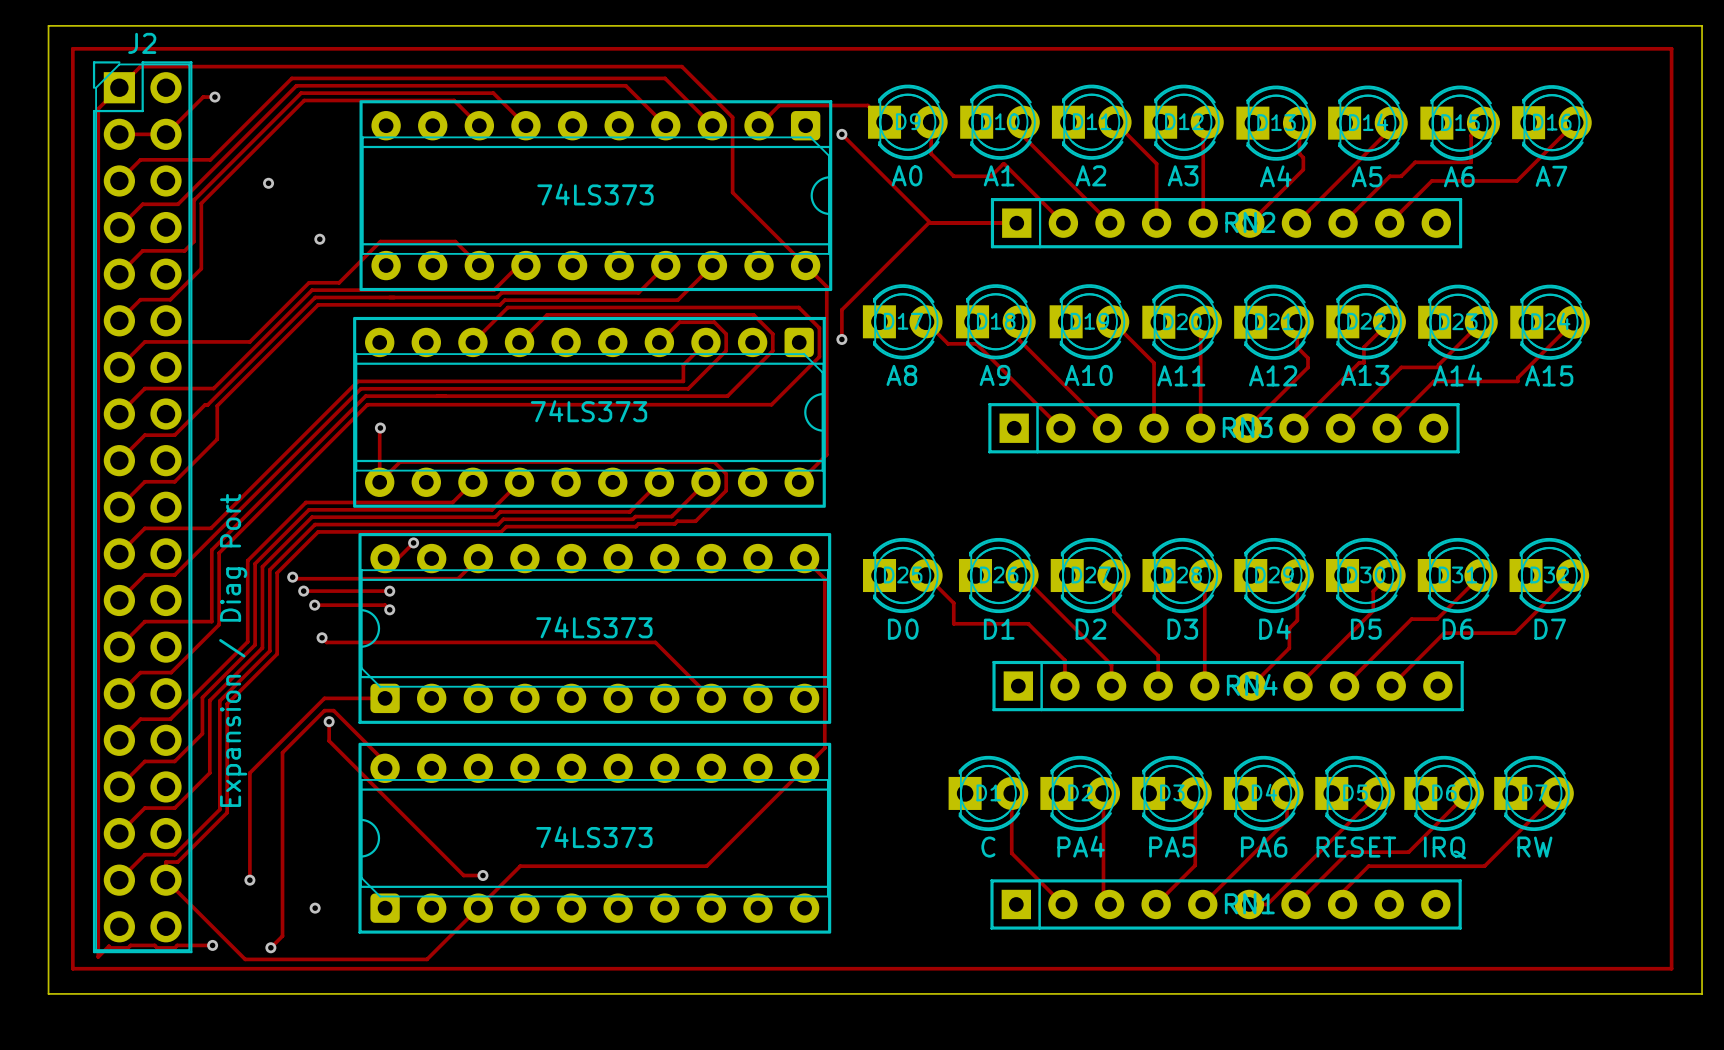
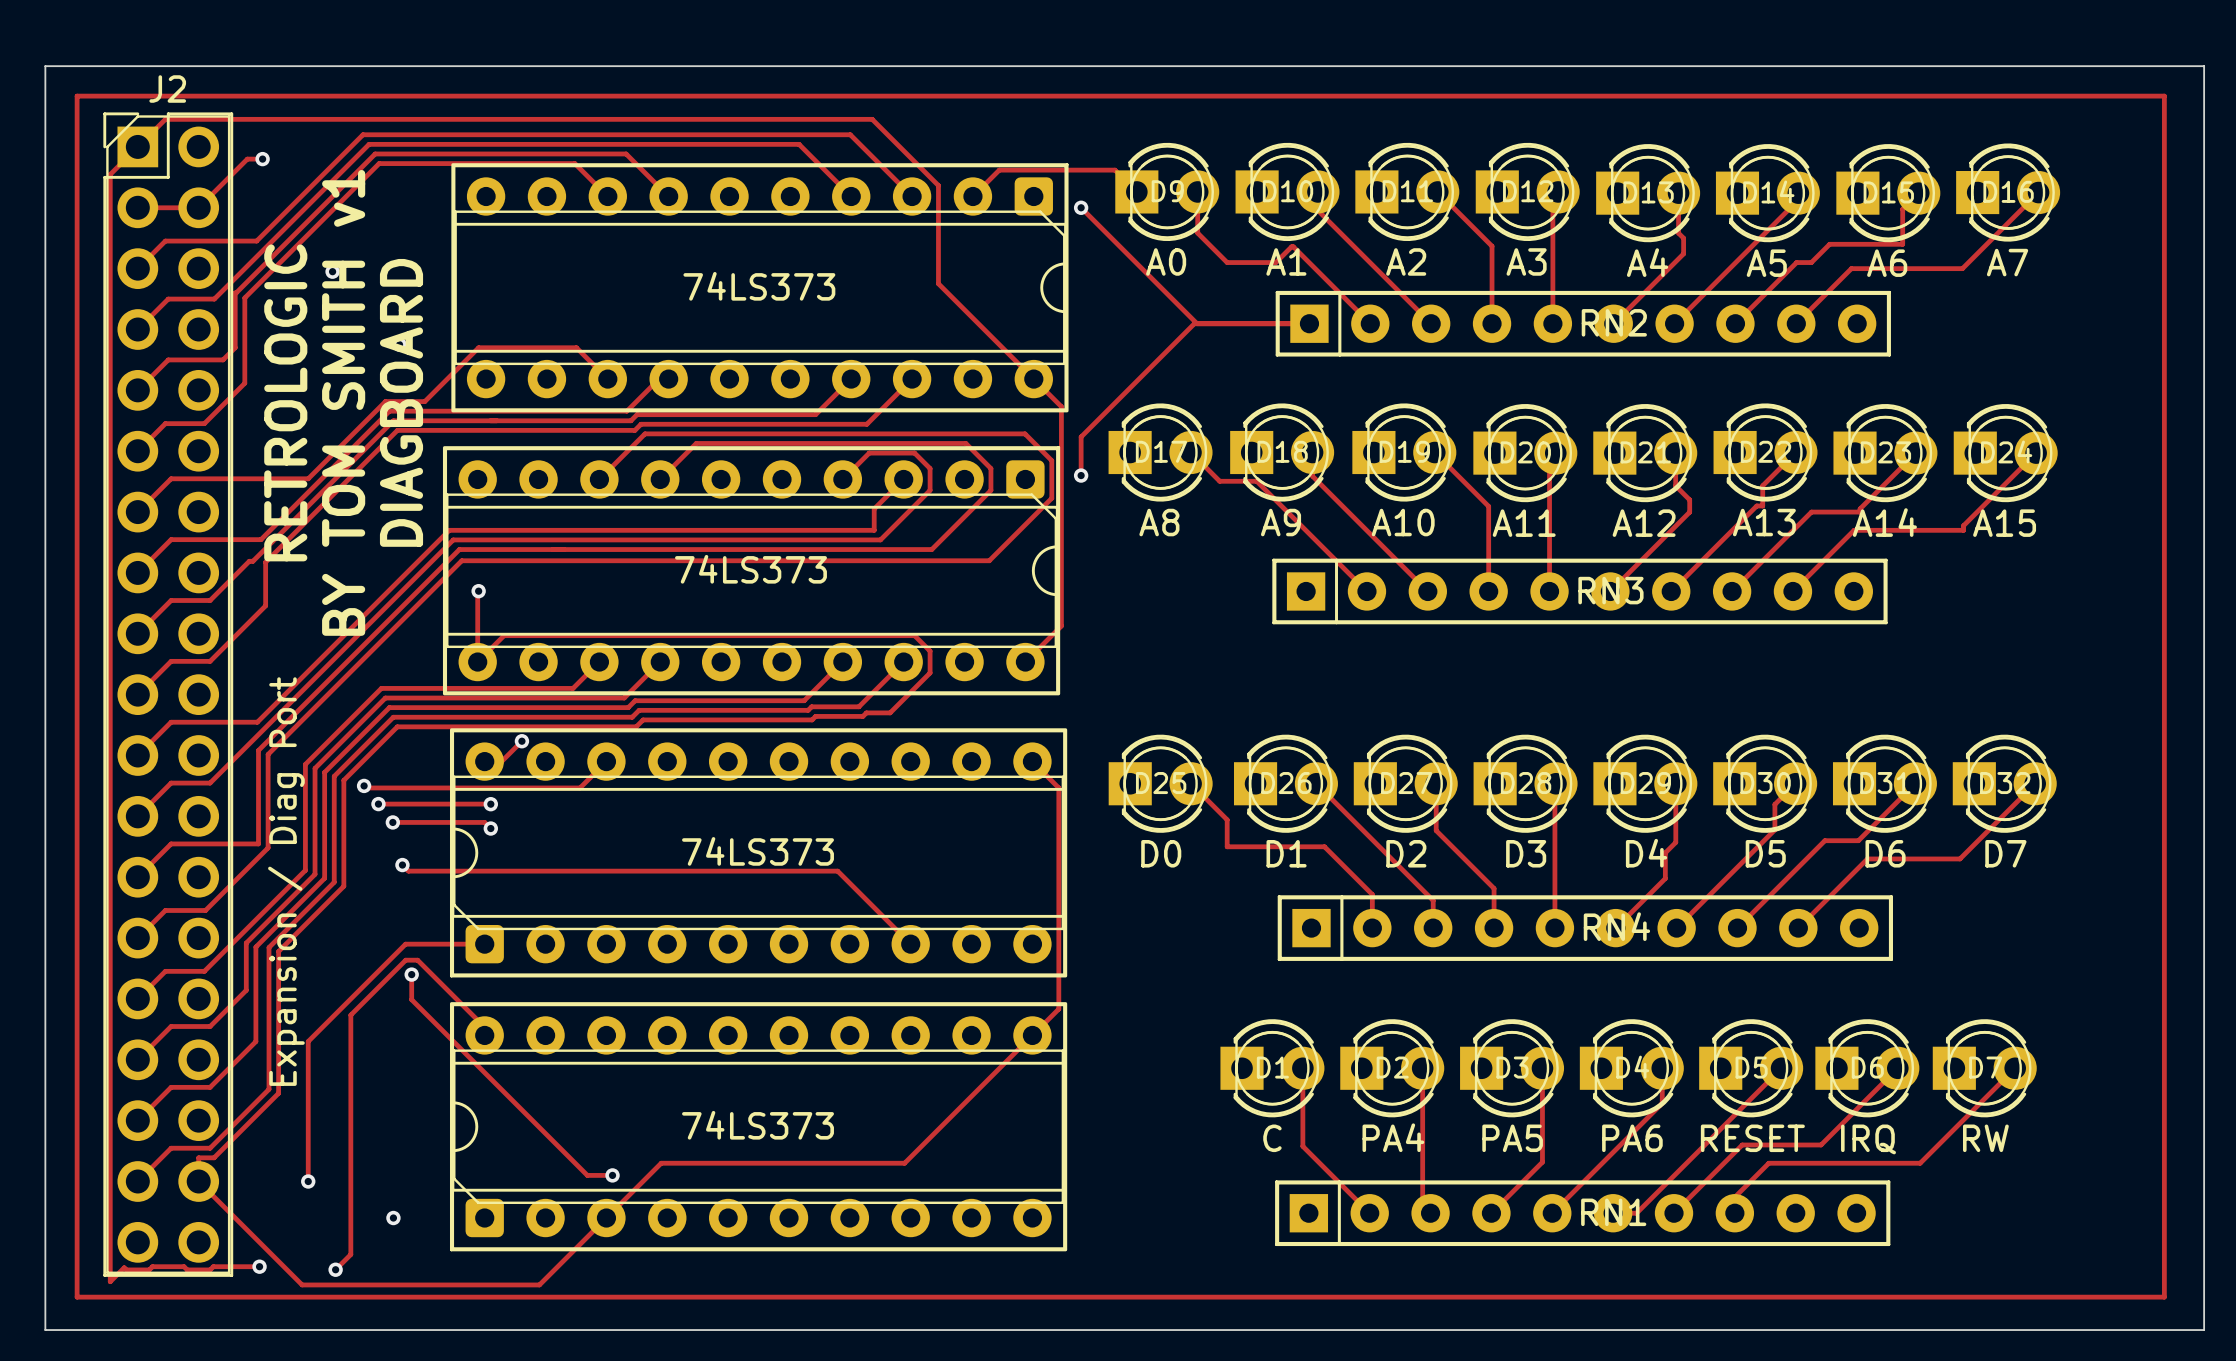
text: none -> RETROLOGIC (285, 402)
text: none -> BY TOM SMITH v1 (343, 402)
text: none -> DIAGBOARD (401, 402)

